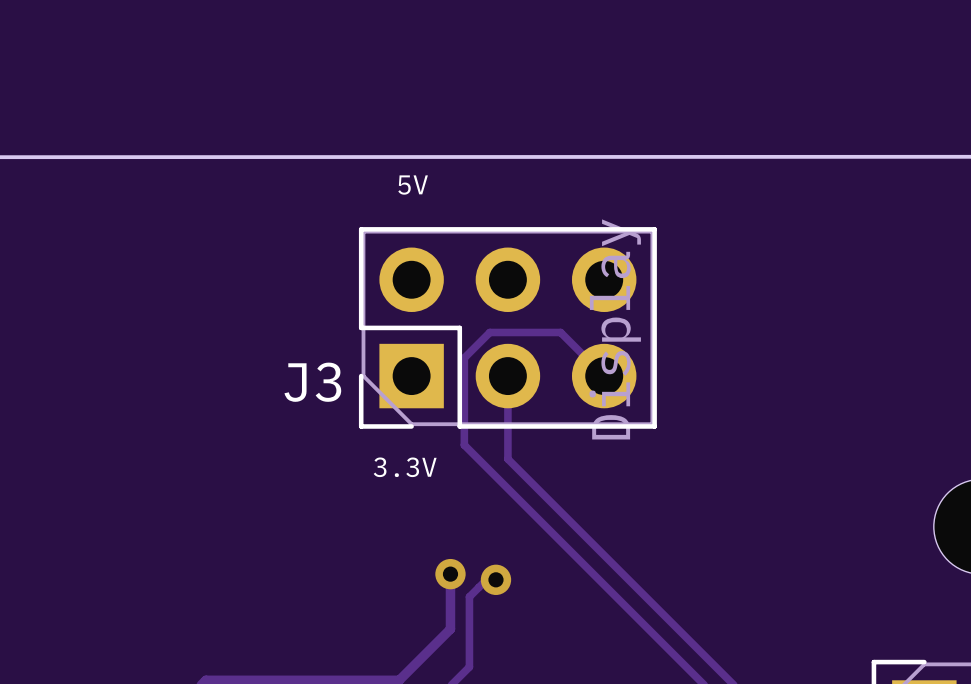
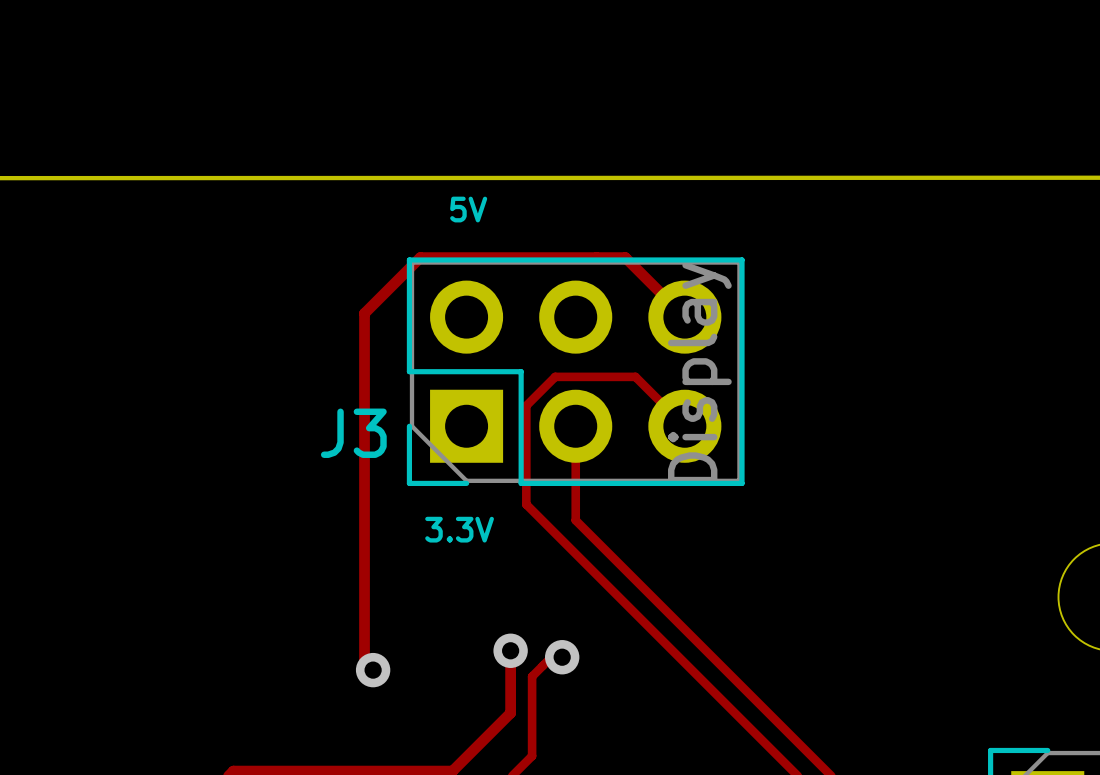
track: none -> (684, 317) (625, 257) (420, 257) (364, 313) (364, 661) (373, 670)
via: none -> (373, 670)

